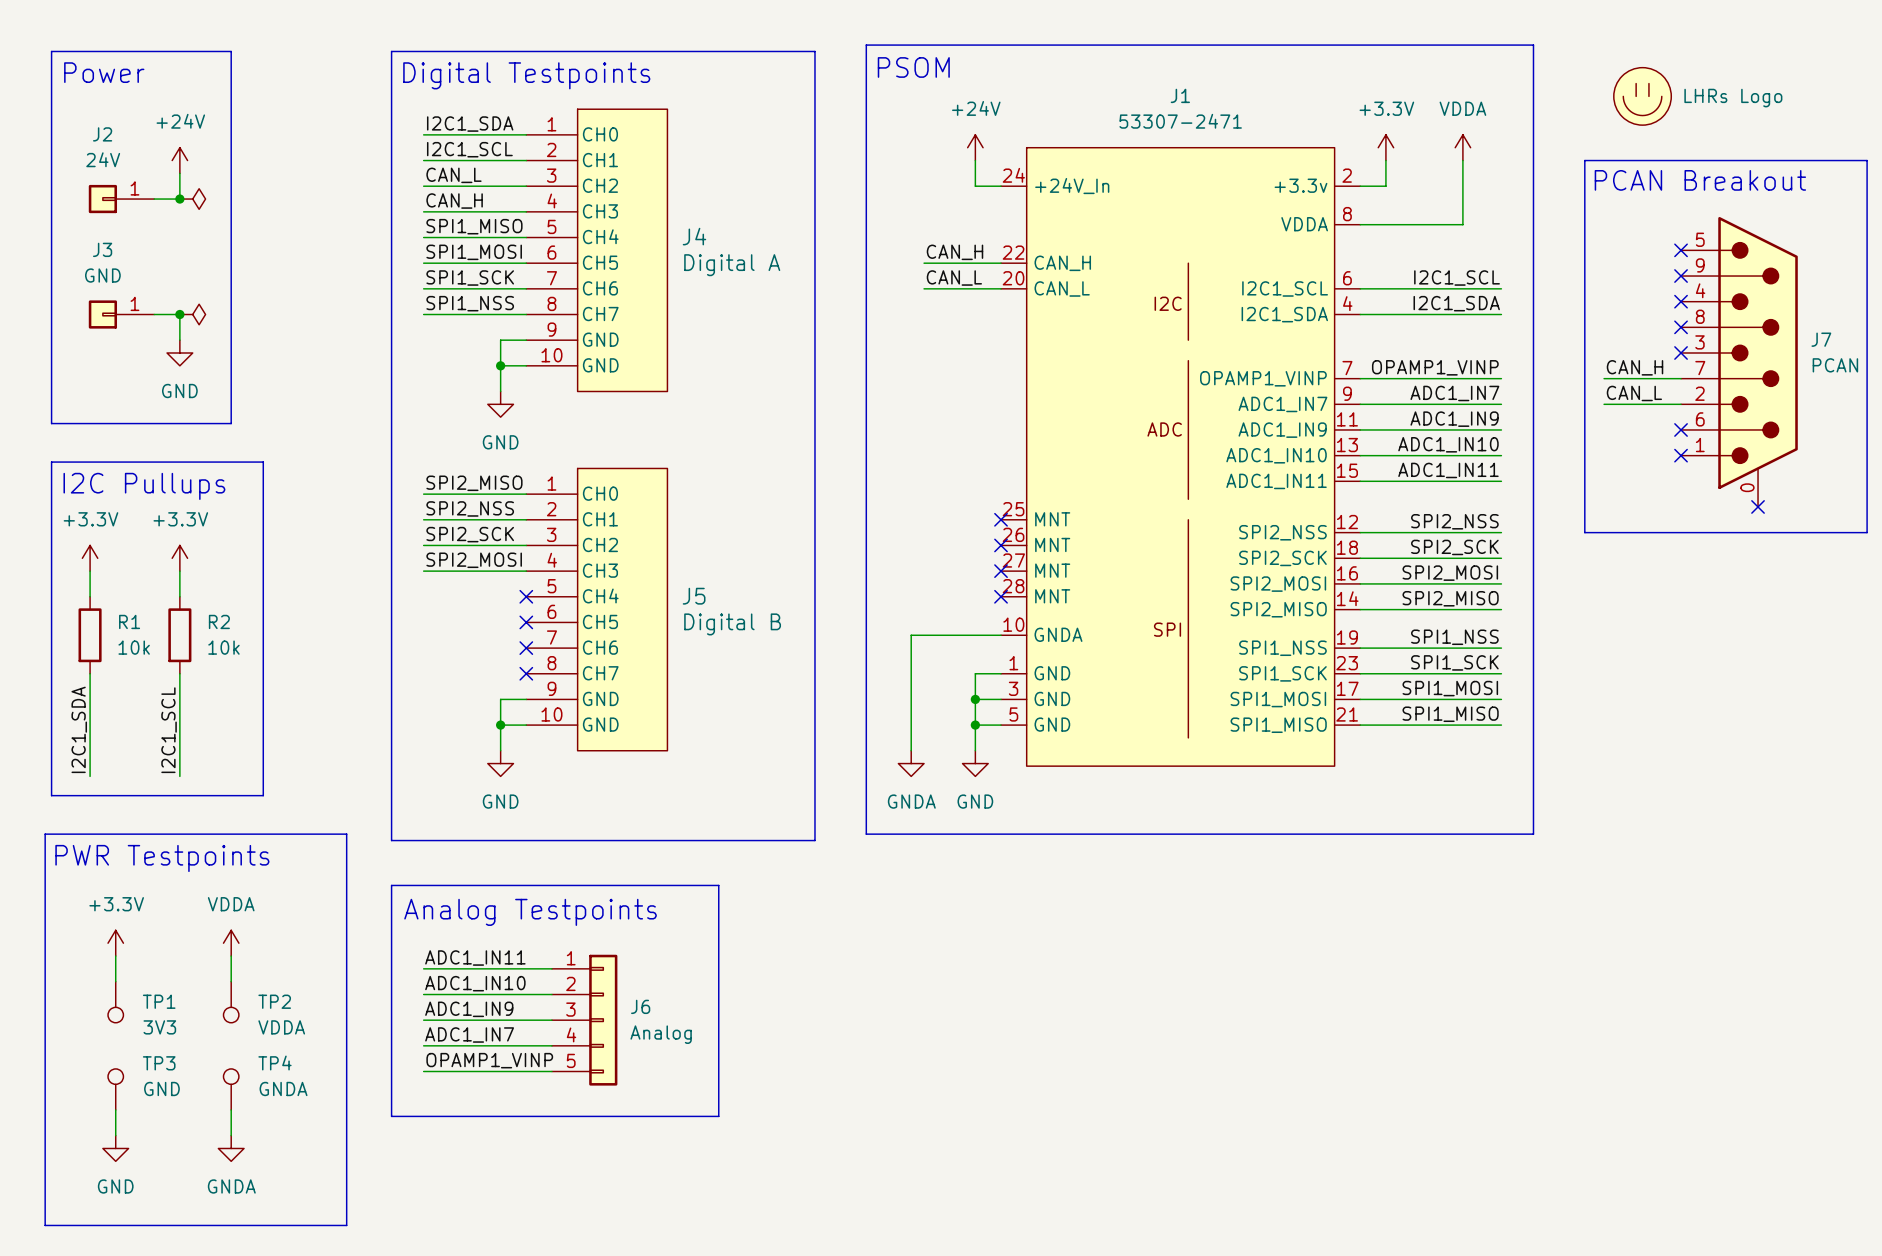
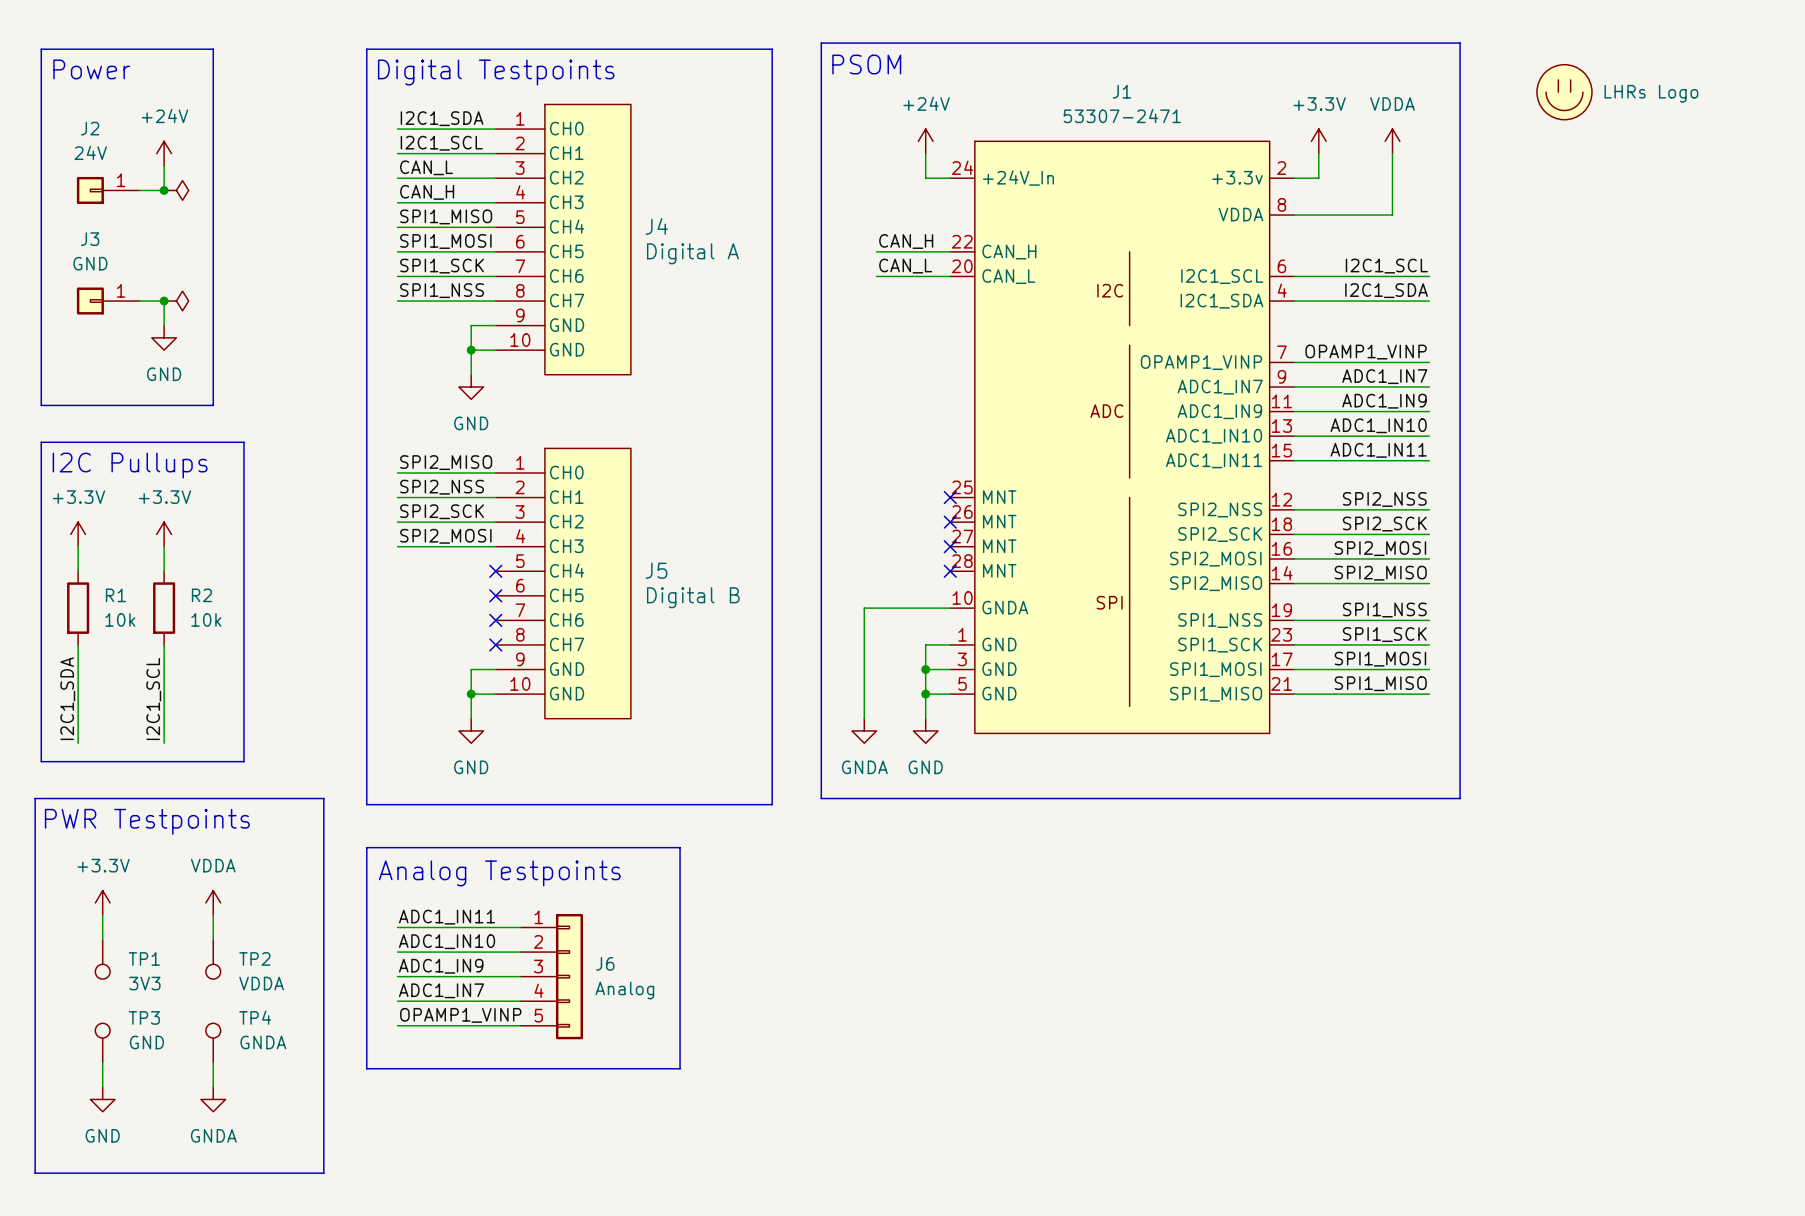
line: (1584, 160) (1867, 160) (1867, 532) (1584, 532) (1584, 160) -> none
text: PCAN Breakout (1700, 180) -> none
no-connect mark: (1681, 250) -> none
no-connect mark: (1681, 276) -> none
no-connect mark: (1681, 301) -> none
no-connect mark: (1681, 327) -> none
no-connect mark: (1681, 353) -> none
J7: PCAN (1739, 361) -> none
label: CAN_H (1635, 367) -> none
wire: (1604, 378) (1681, 378) -> none
label: CAN_L (1634, 393) -> none
wire: (1604, 404) (1681, 404) -> none
no-connect mark: (1681, 429) -> none
no-connect mark: (1681, 455) -> none
no-connect mark: (1758, 506) -> none

